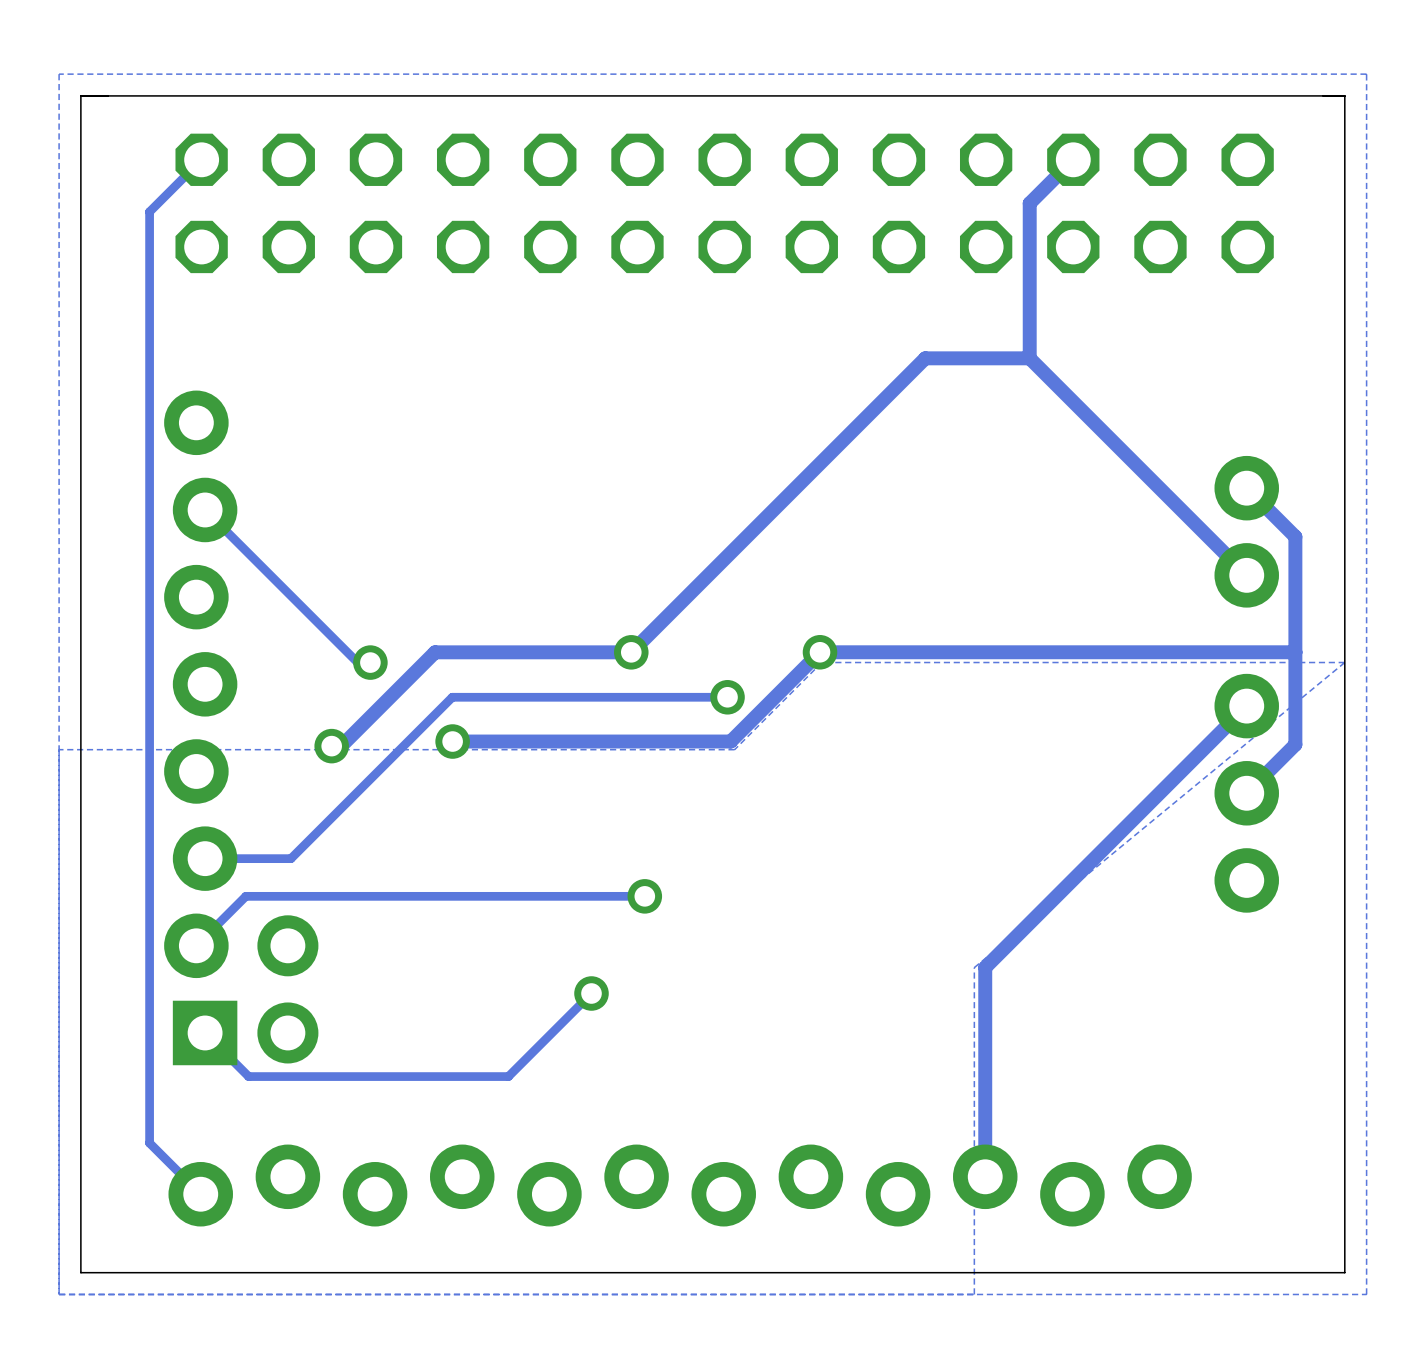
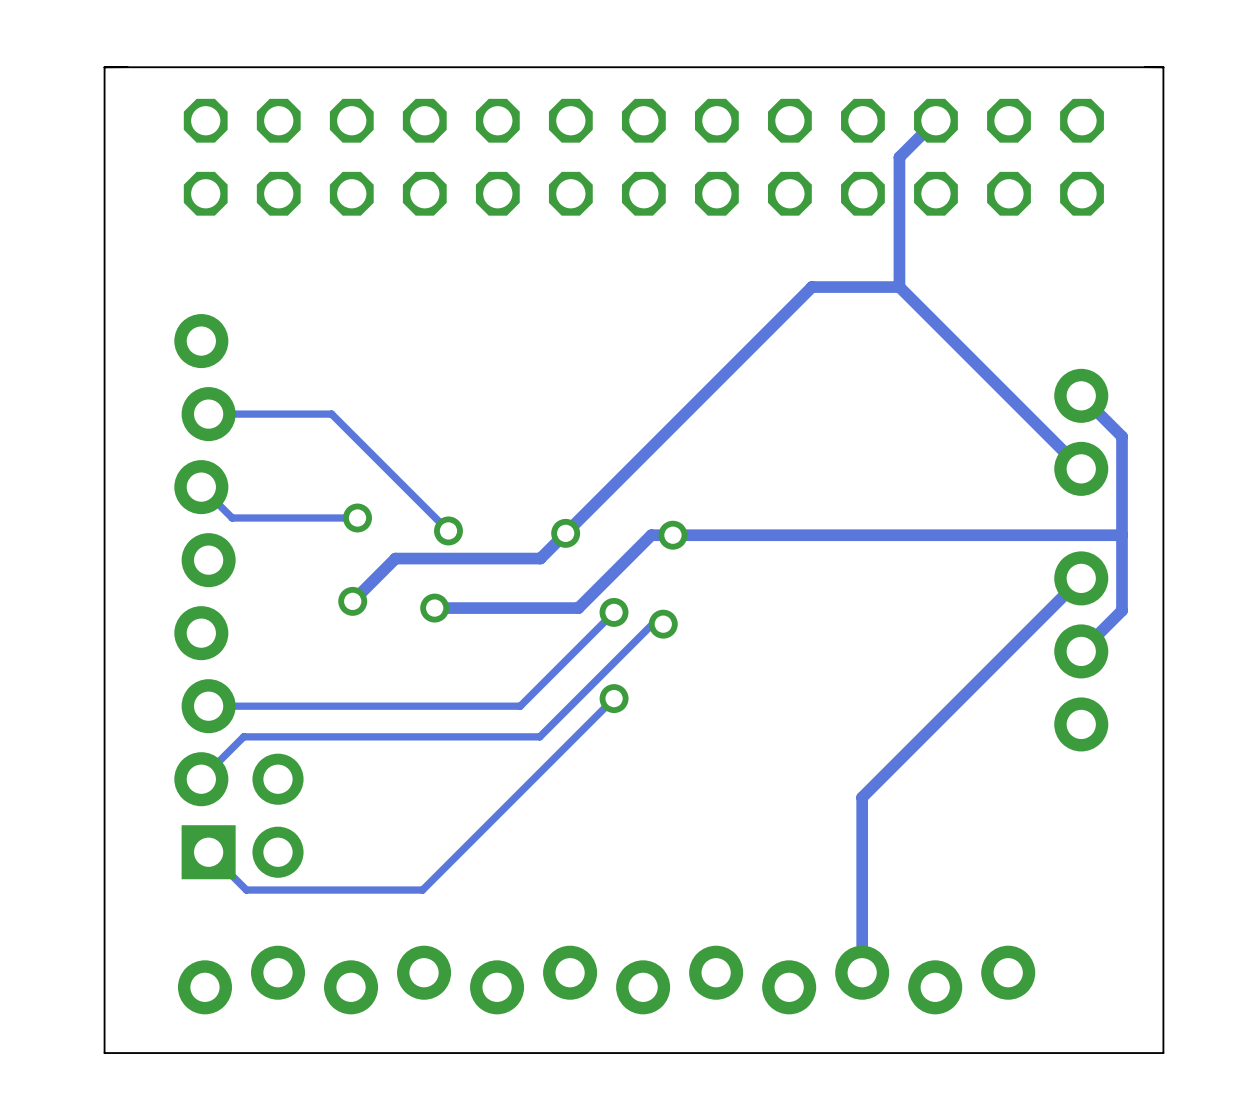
zone outline: (1366, 74) (59, 74) (59, 1294) (1366, 1294) (1366, 74) -> none
track: (201, 159) (149, 211) (149, 1143) (200, 1194) -> none
track: (205, 509) (357, 662) (370, 662) -> (208, 414) (331, 414) (448, 530)
track: none -> (201, 487) (232, 518) (357, 518)
via: none -> (448, 530)
track: (631, 652) (435, 652) (341, 746) (331, 746) -> (565, 533) (540, 558) (395, 558) (352, 601)
via: (820, 652) -> none
track: (1295, 652) (820, 652) (730, 741) (646, 741) -> (1122, 535) (651, 535) (578, 608)
via: none -> (672, 535)
via position: (370, 662) -> (357, 518)
track: (727, 697) (452, 697) (290, 858) -> (614, 612) (520, 706) (280, 706)
via: (727, 697) -> none
via: none -> (352, 601)
via position: (452, 741) -> (434, 608)
via: (331, 746) -> none
via: none -> (614, 612)
zone outline: (59, 749) (734, 749) (821, 662) (1344, 662) (974, 967) (974, 1294) -> none
via: none -> (663, 624)
track: (644, 896) (245, 896) -> (663, 624) (652, 624) (539, 736) (242, 737)
via position: (644, 896) -> (614, 698)
track: (591, 993) (508, 1076) (248, 1076) -> (614, 698) (422, 890) (245, 888)
via: (591, 993) -> none

